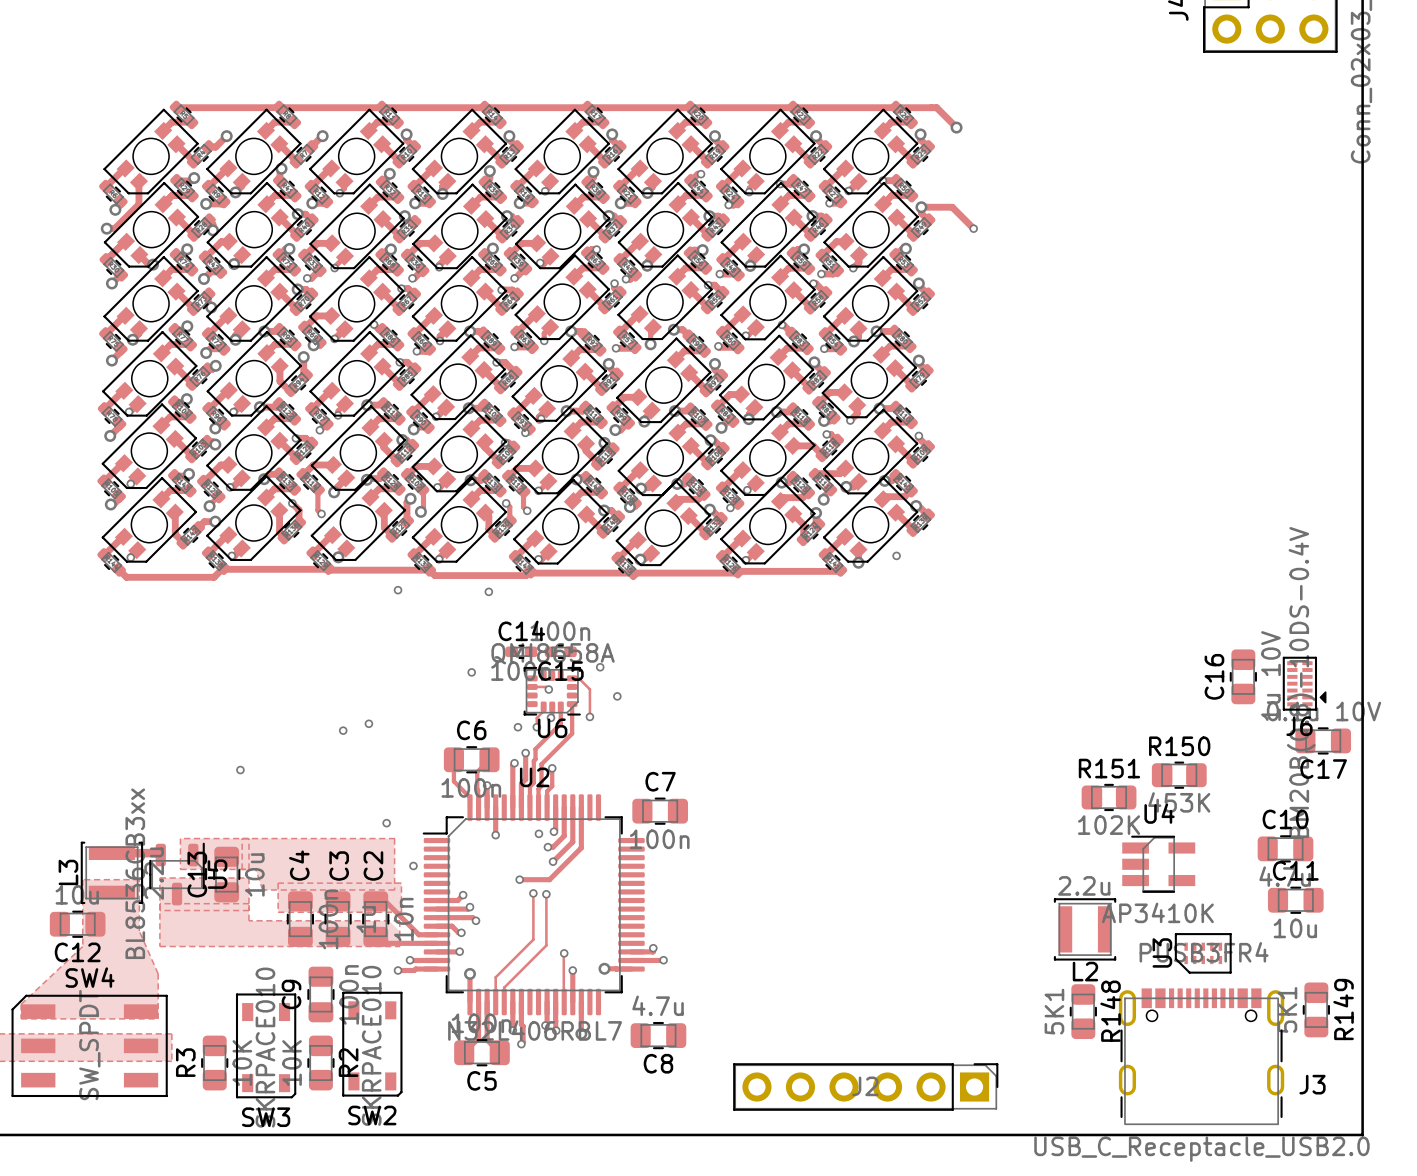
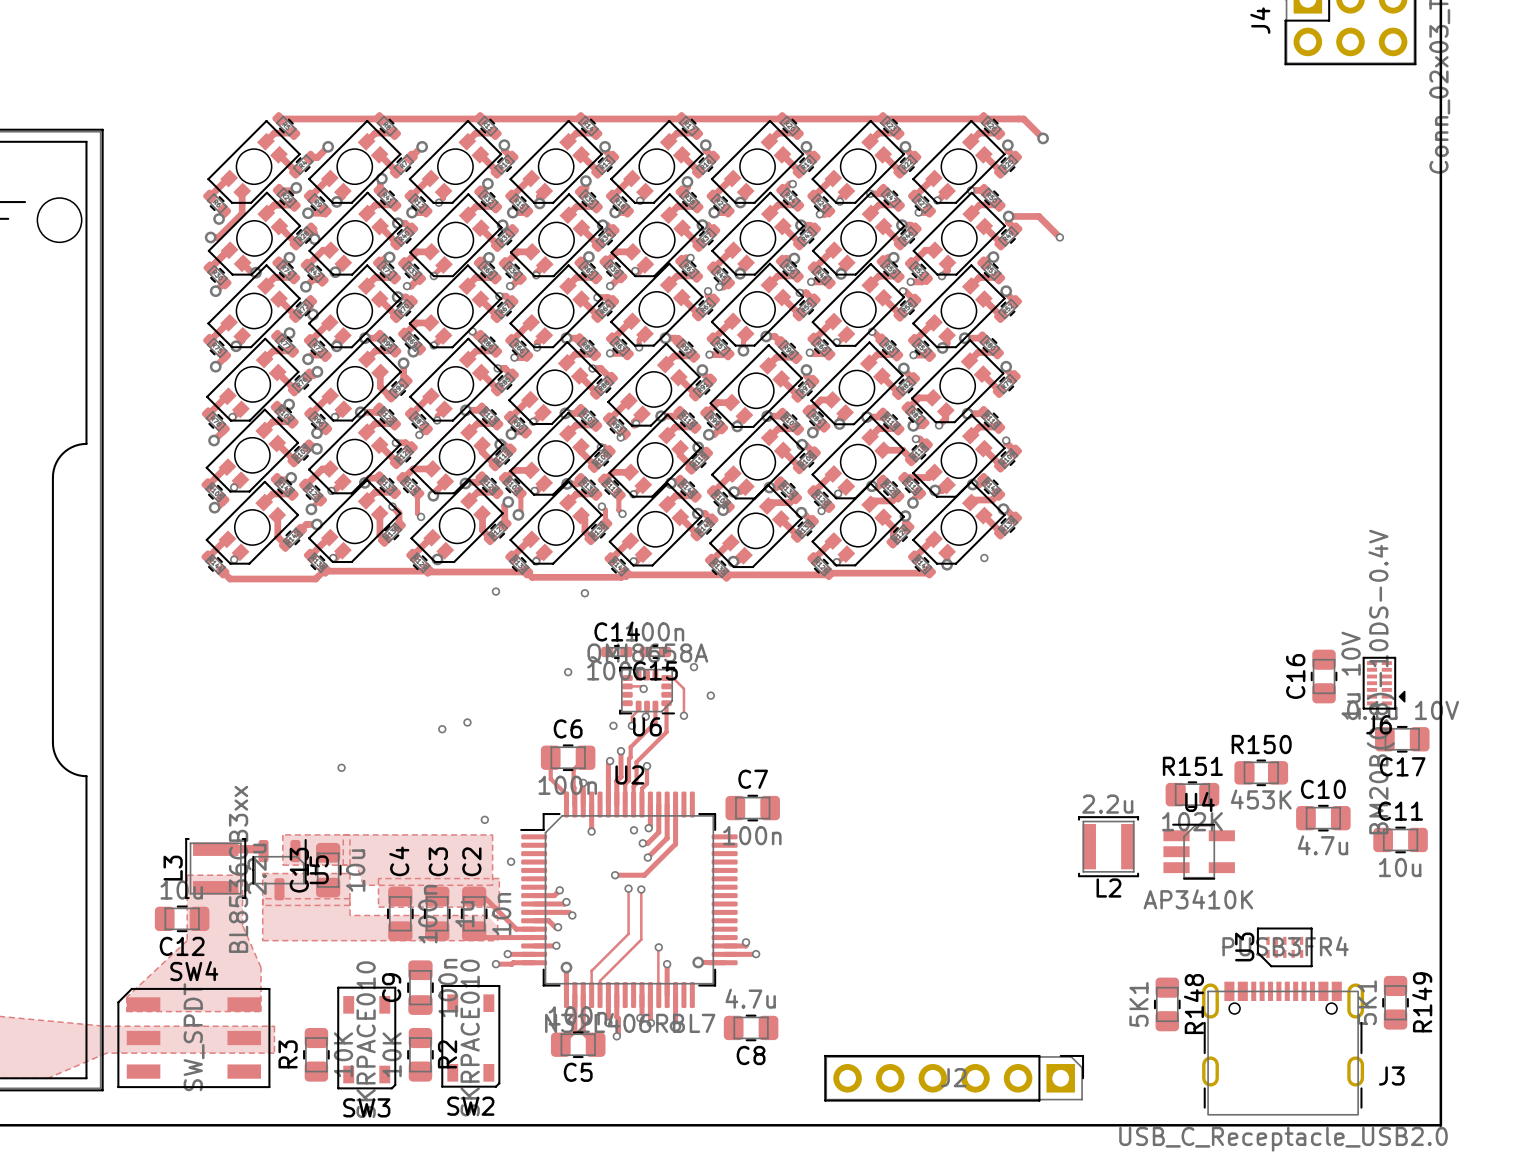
C10 position: (1285, 848) -> (1323, 818)
U4 position: (1158, 864) -> (1199, 851)
C11 position: (1295, 900) -> (1400, 839)
L2 position: (1085, 929) -> (1108, 846)

